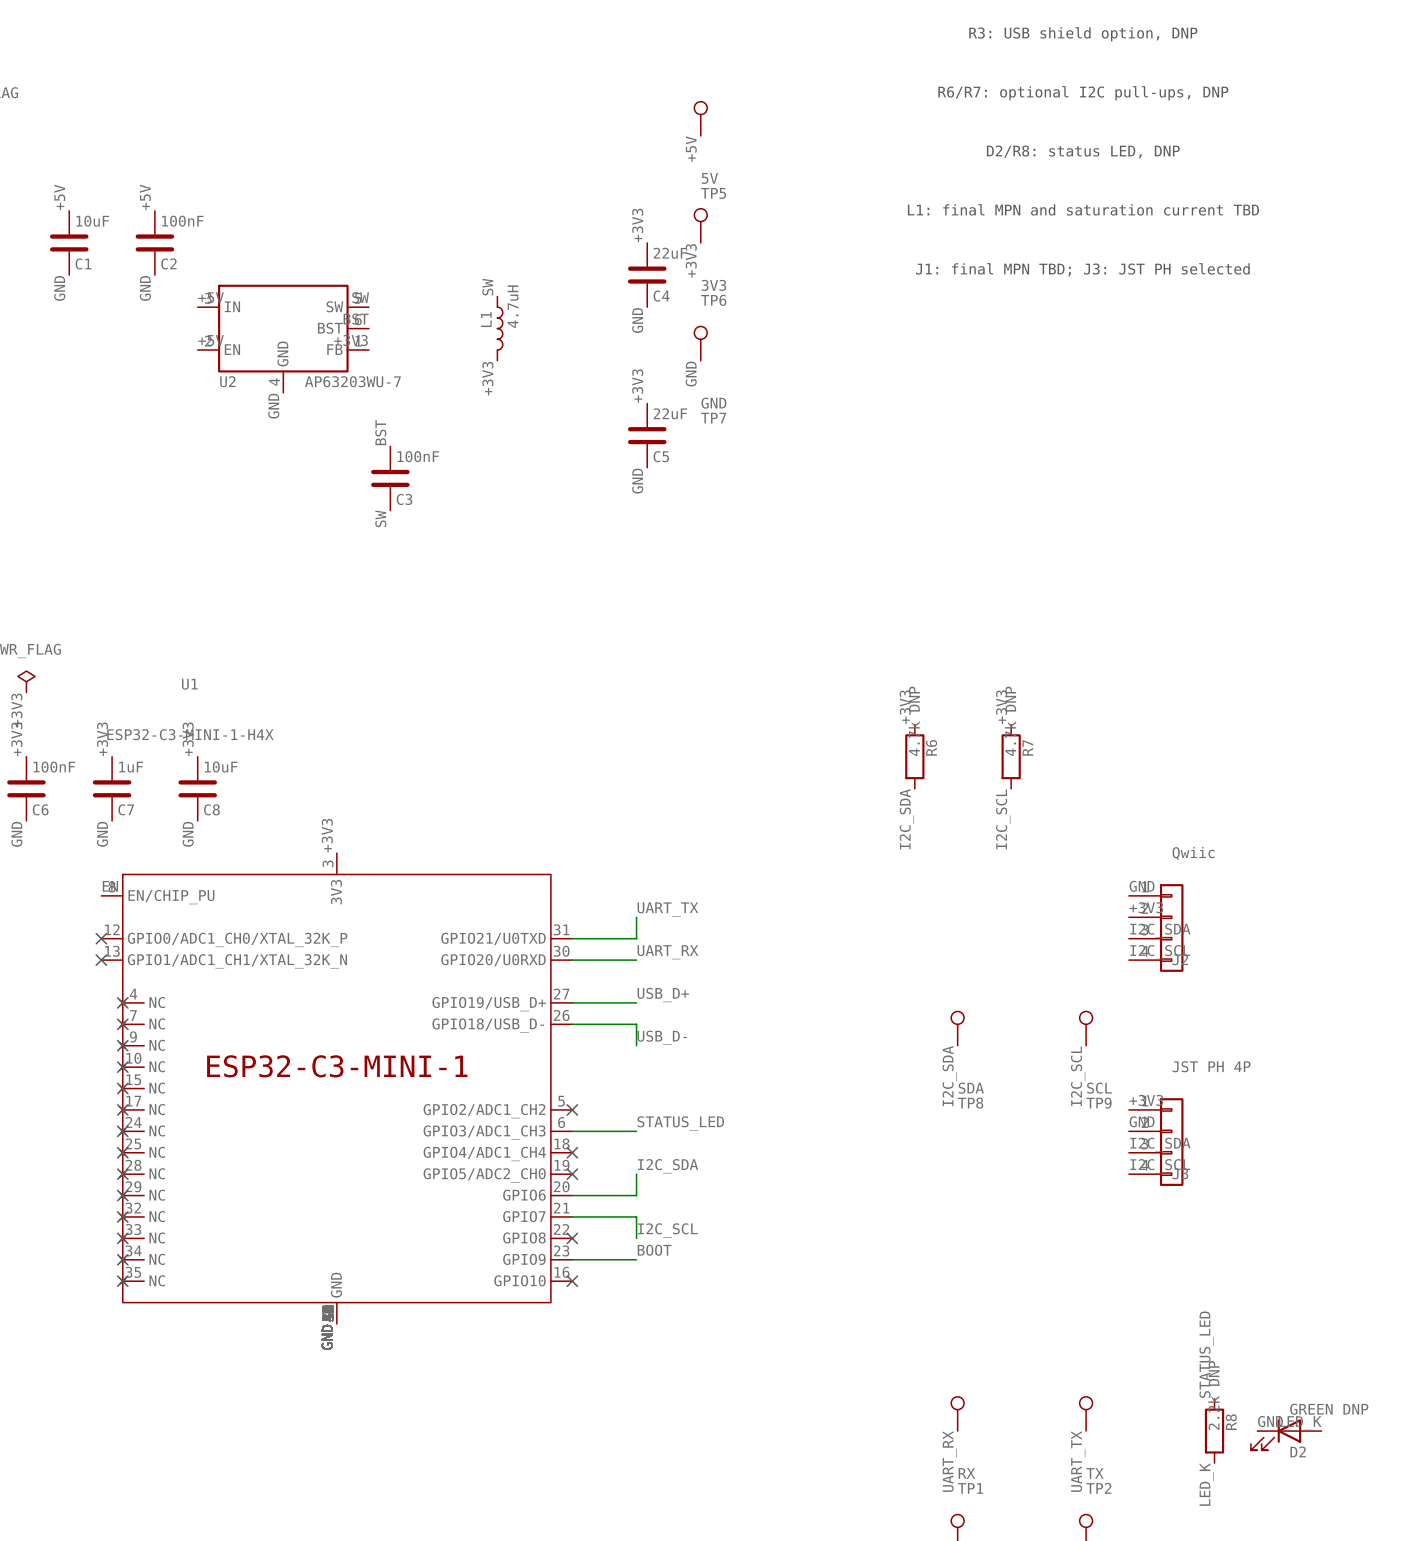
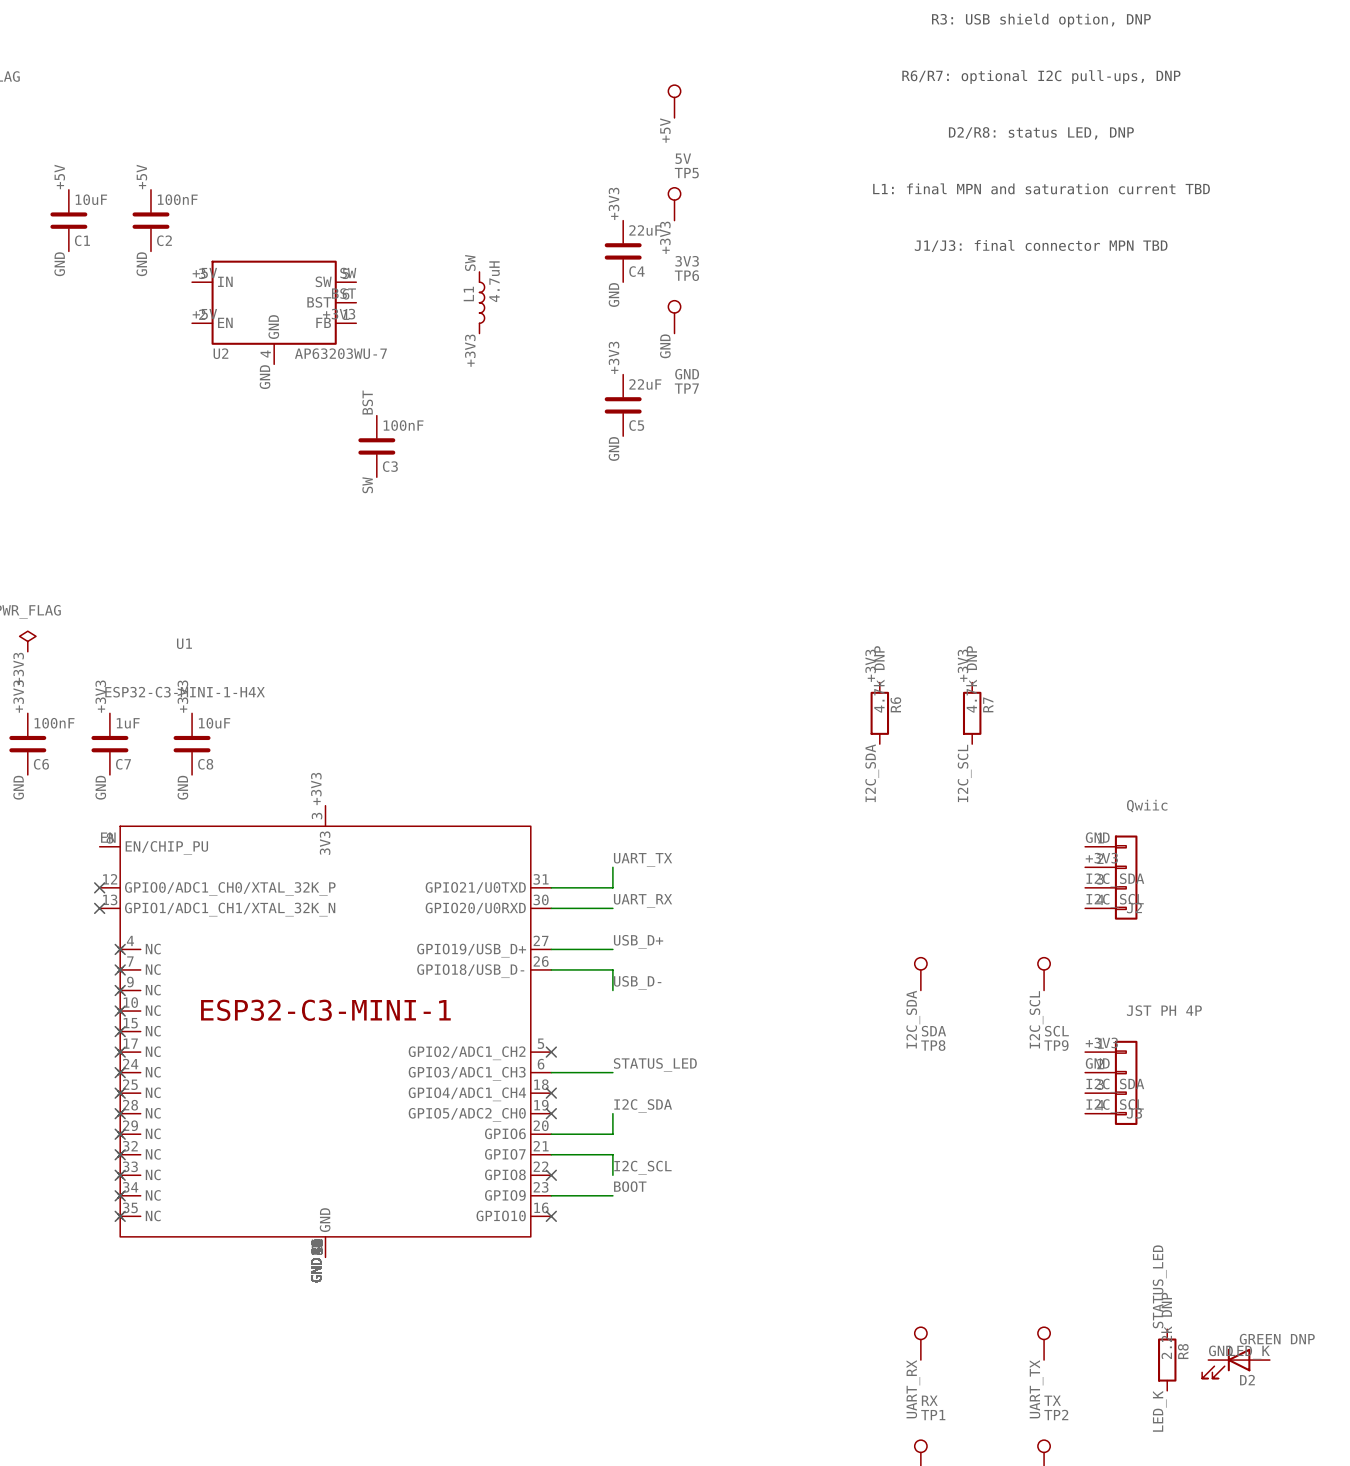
text: J1: final MPN TBD; J3: JST PH selected (1082, 269) -> J1/J3: final connector MPN TBD (1041, 246)

